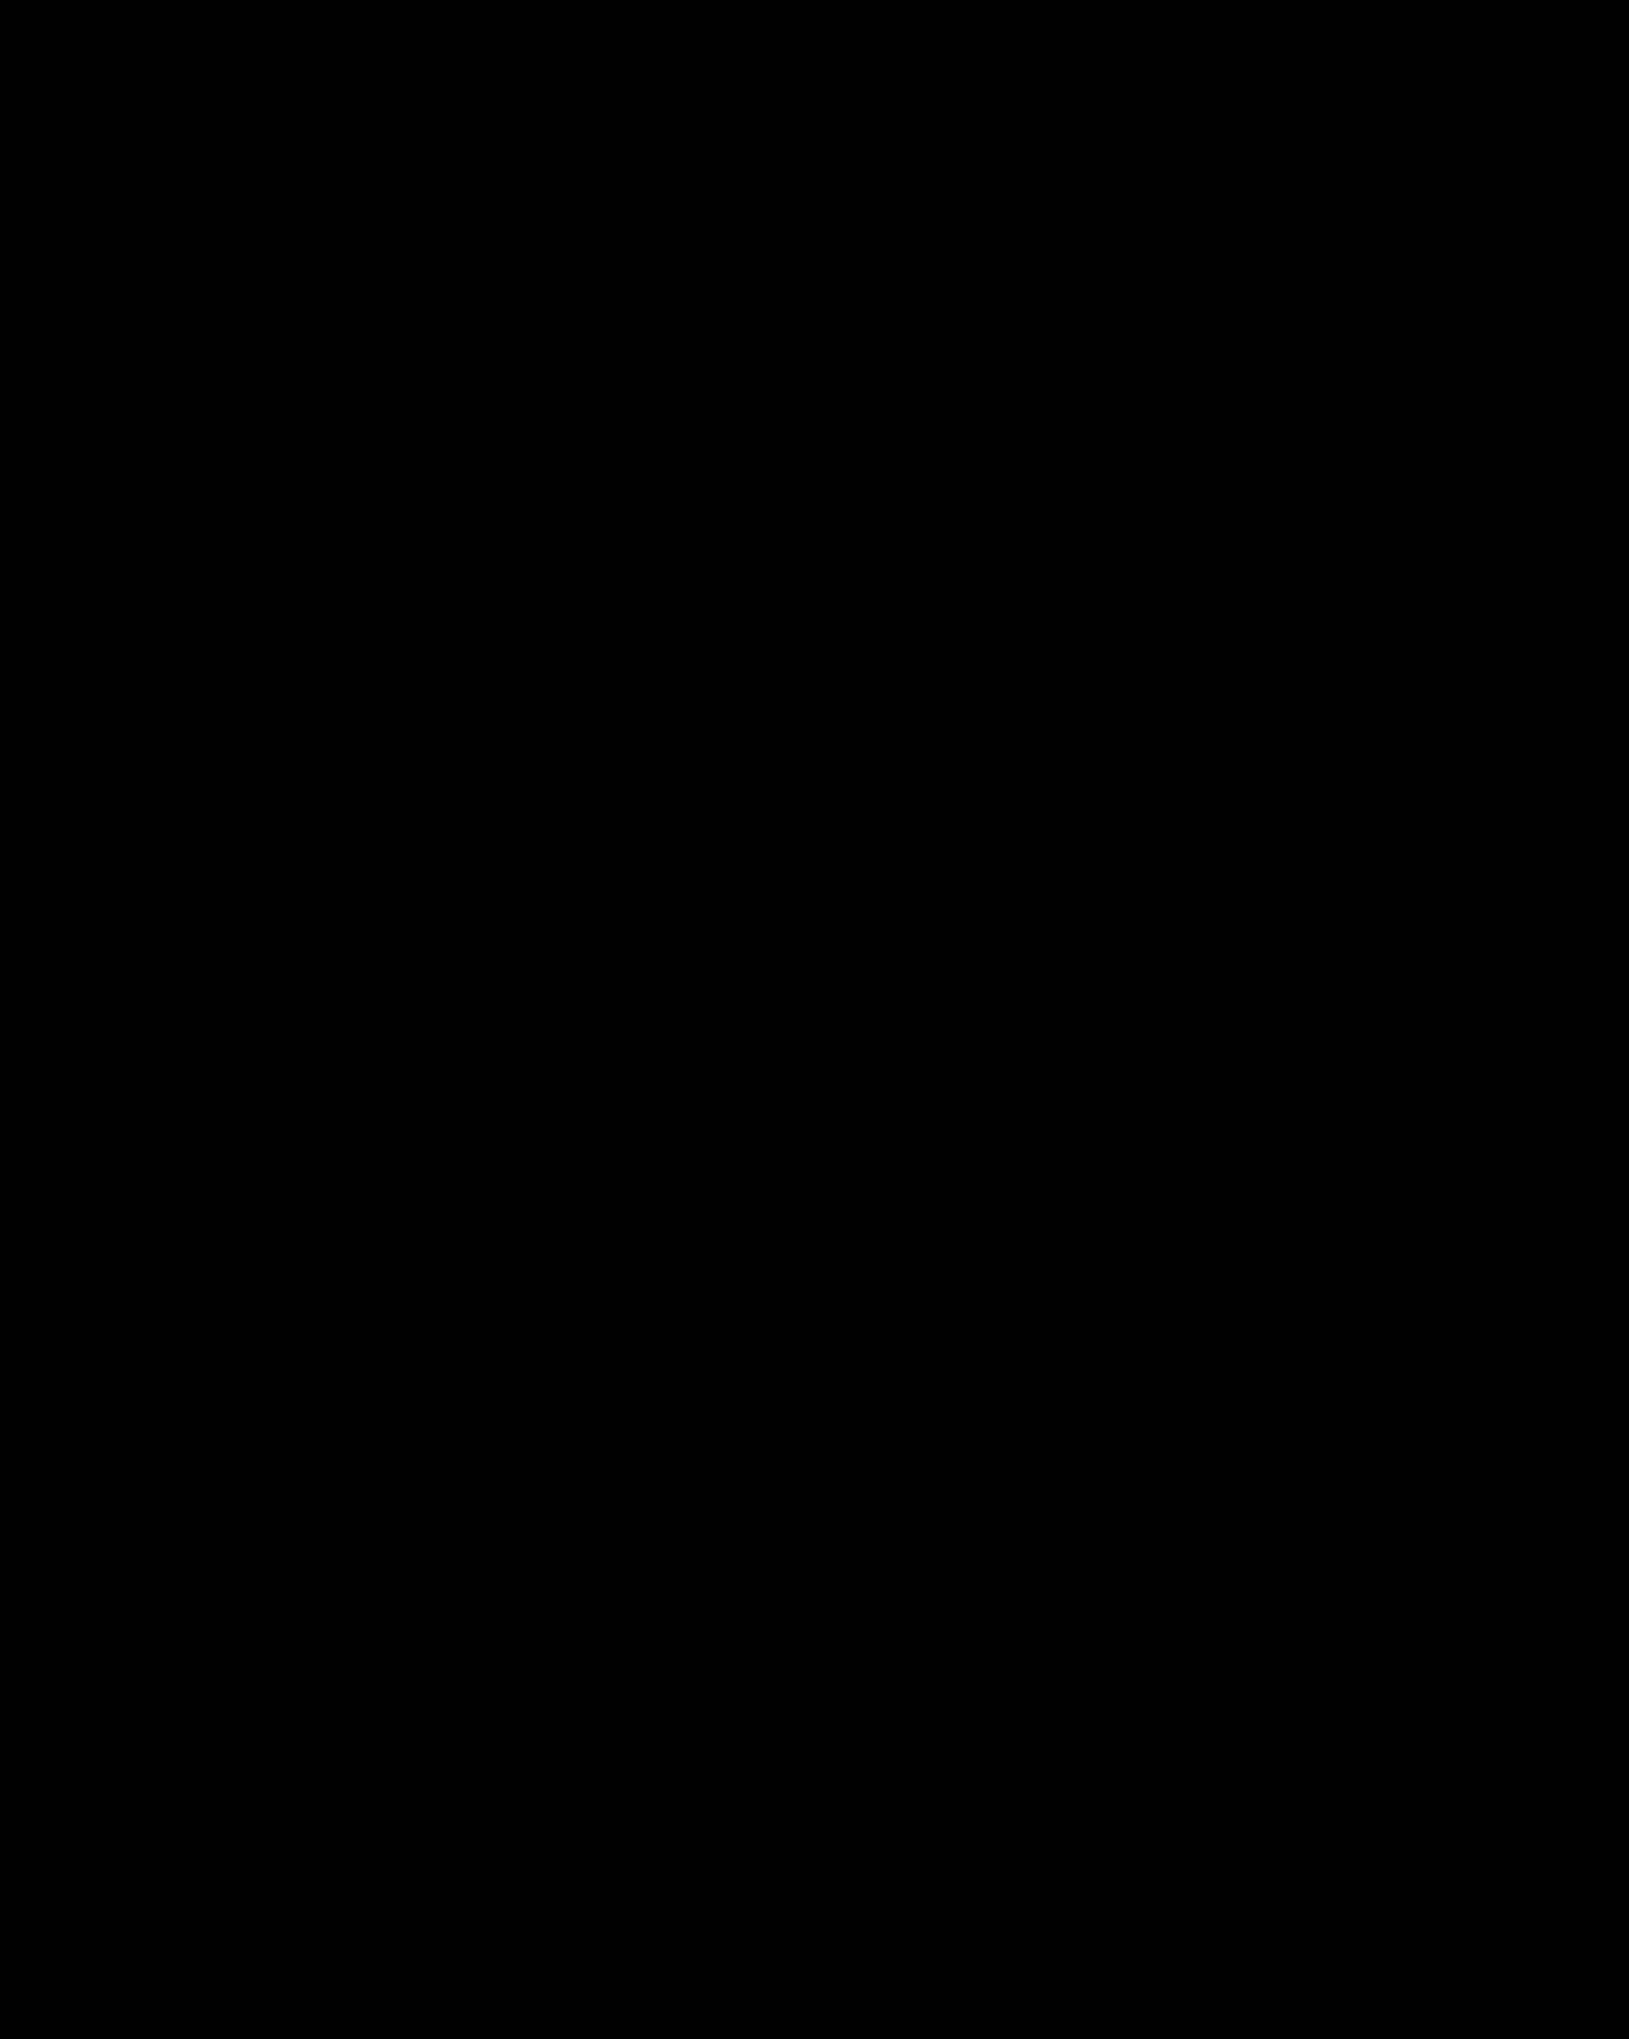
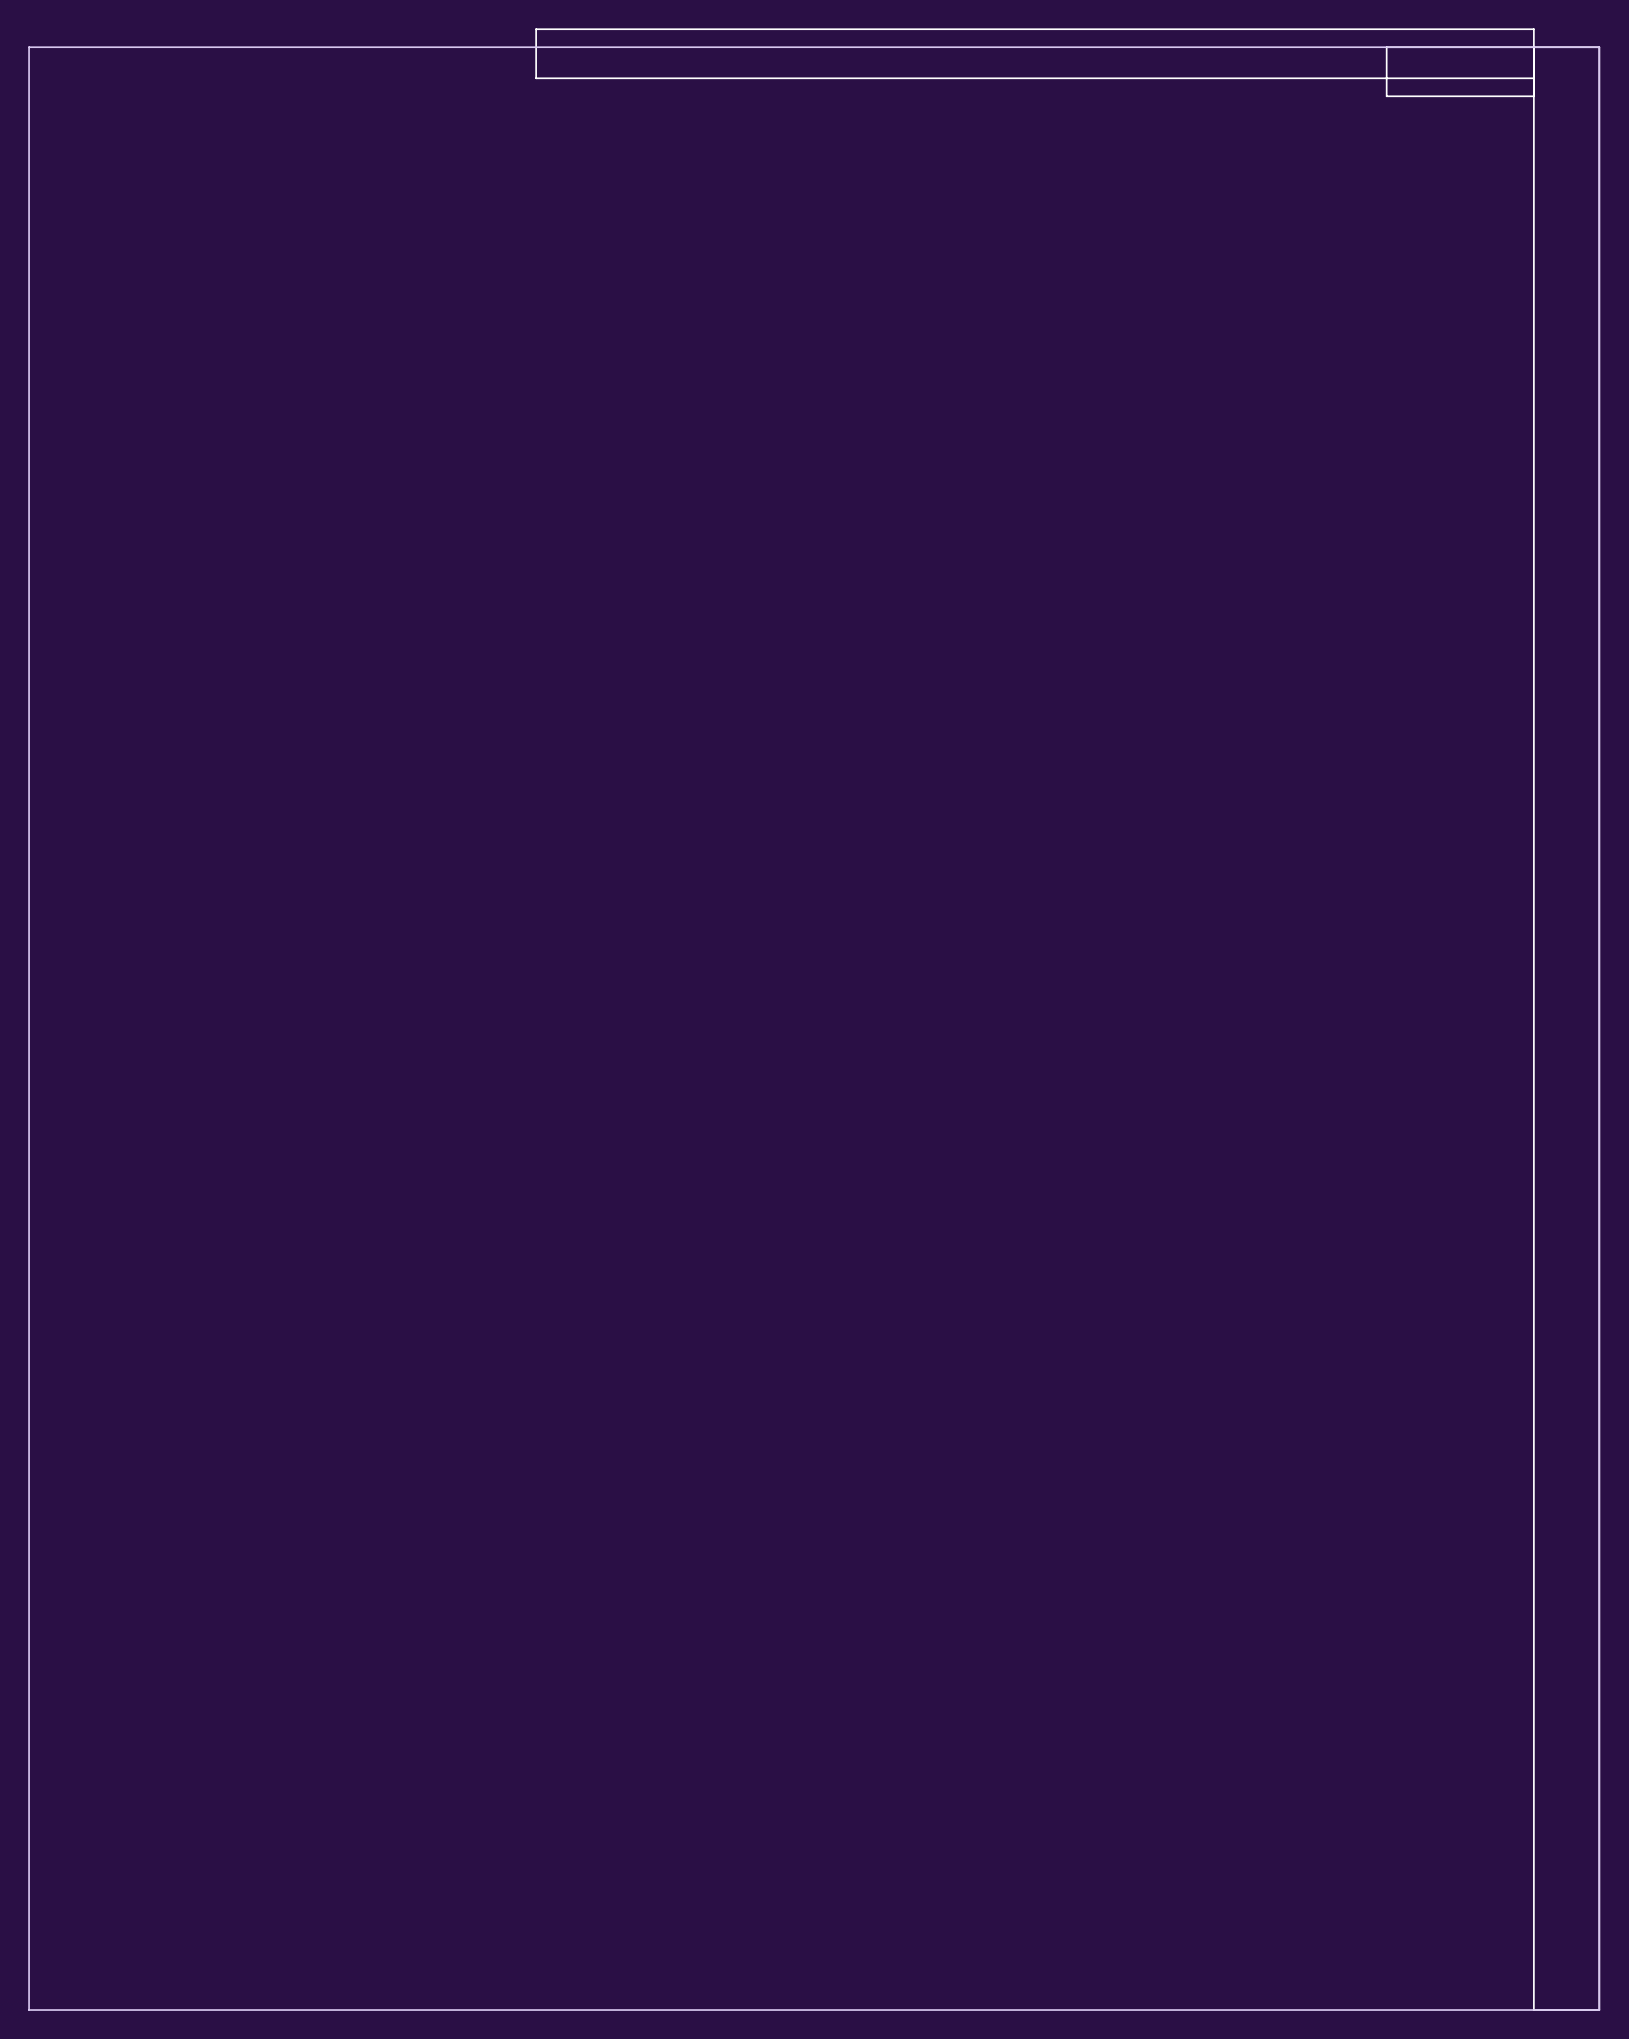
board edge: none -> (29, 47) (1599, 47) (1599, 2010) (29, 2010) (29, 47)
line: none -> (1533, 78) (536, 78) (536, 29) (1533, 29) (1533, 2010) (1599, 2010) (1599, 47) (1386, 47) (1386, 96) (1533, 96)

